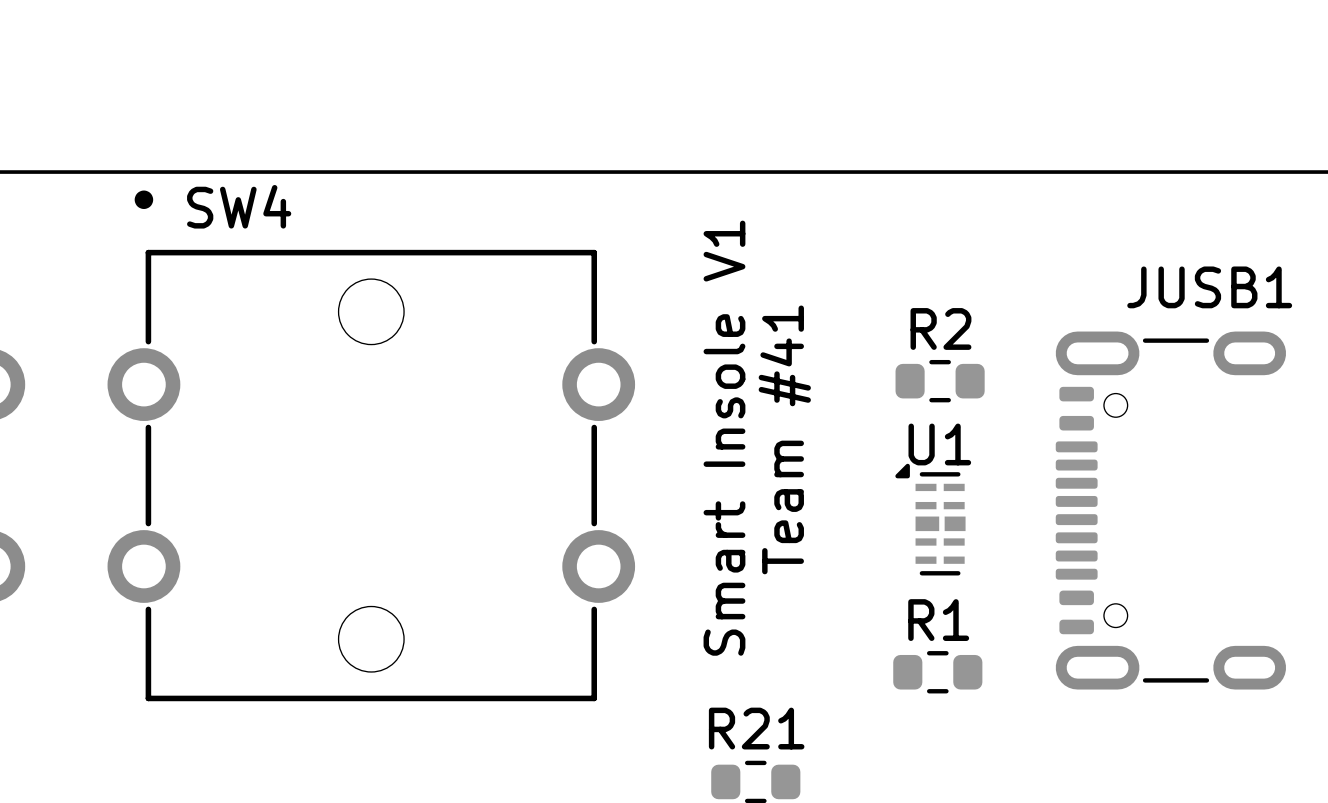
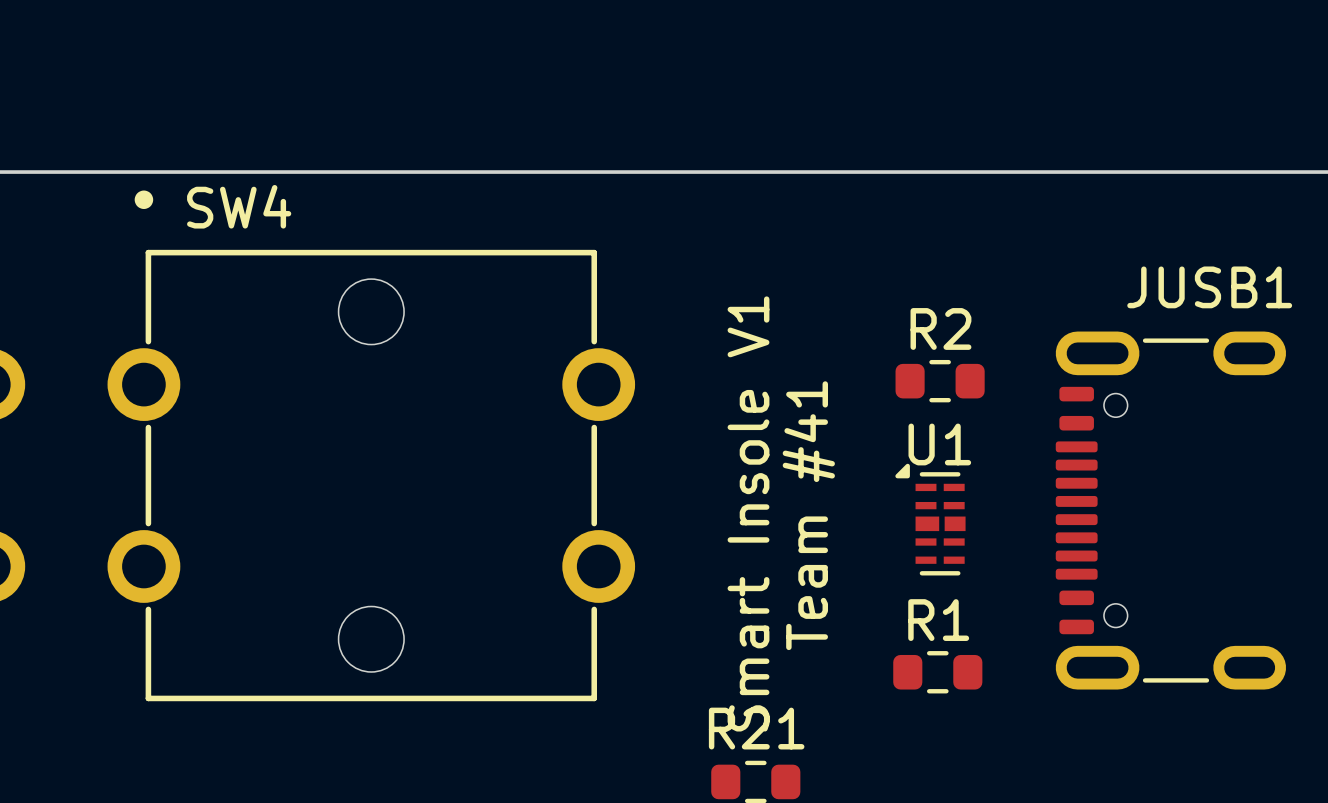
text position: Smart Insole V1 (724, 438) -> Smart Insole V1 (748, 513)
text position: Team #41 (784, 439) -> Team #41 (808, 515)

